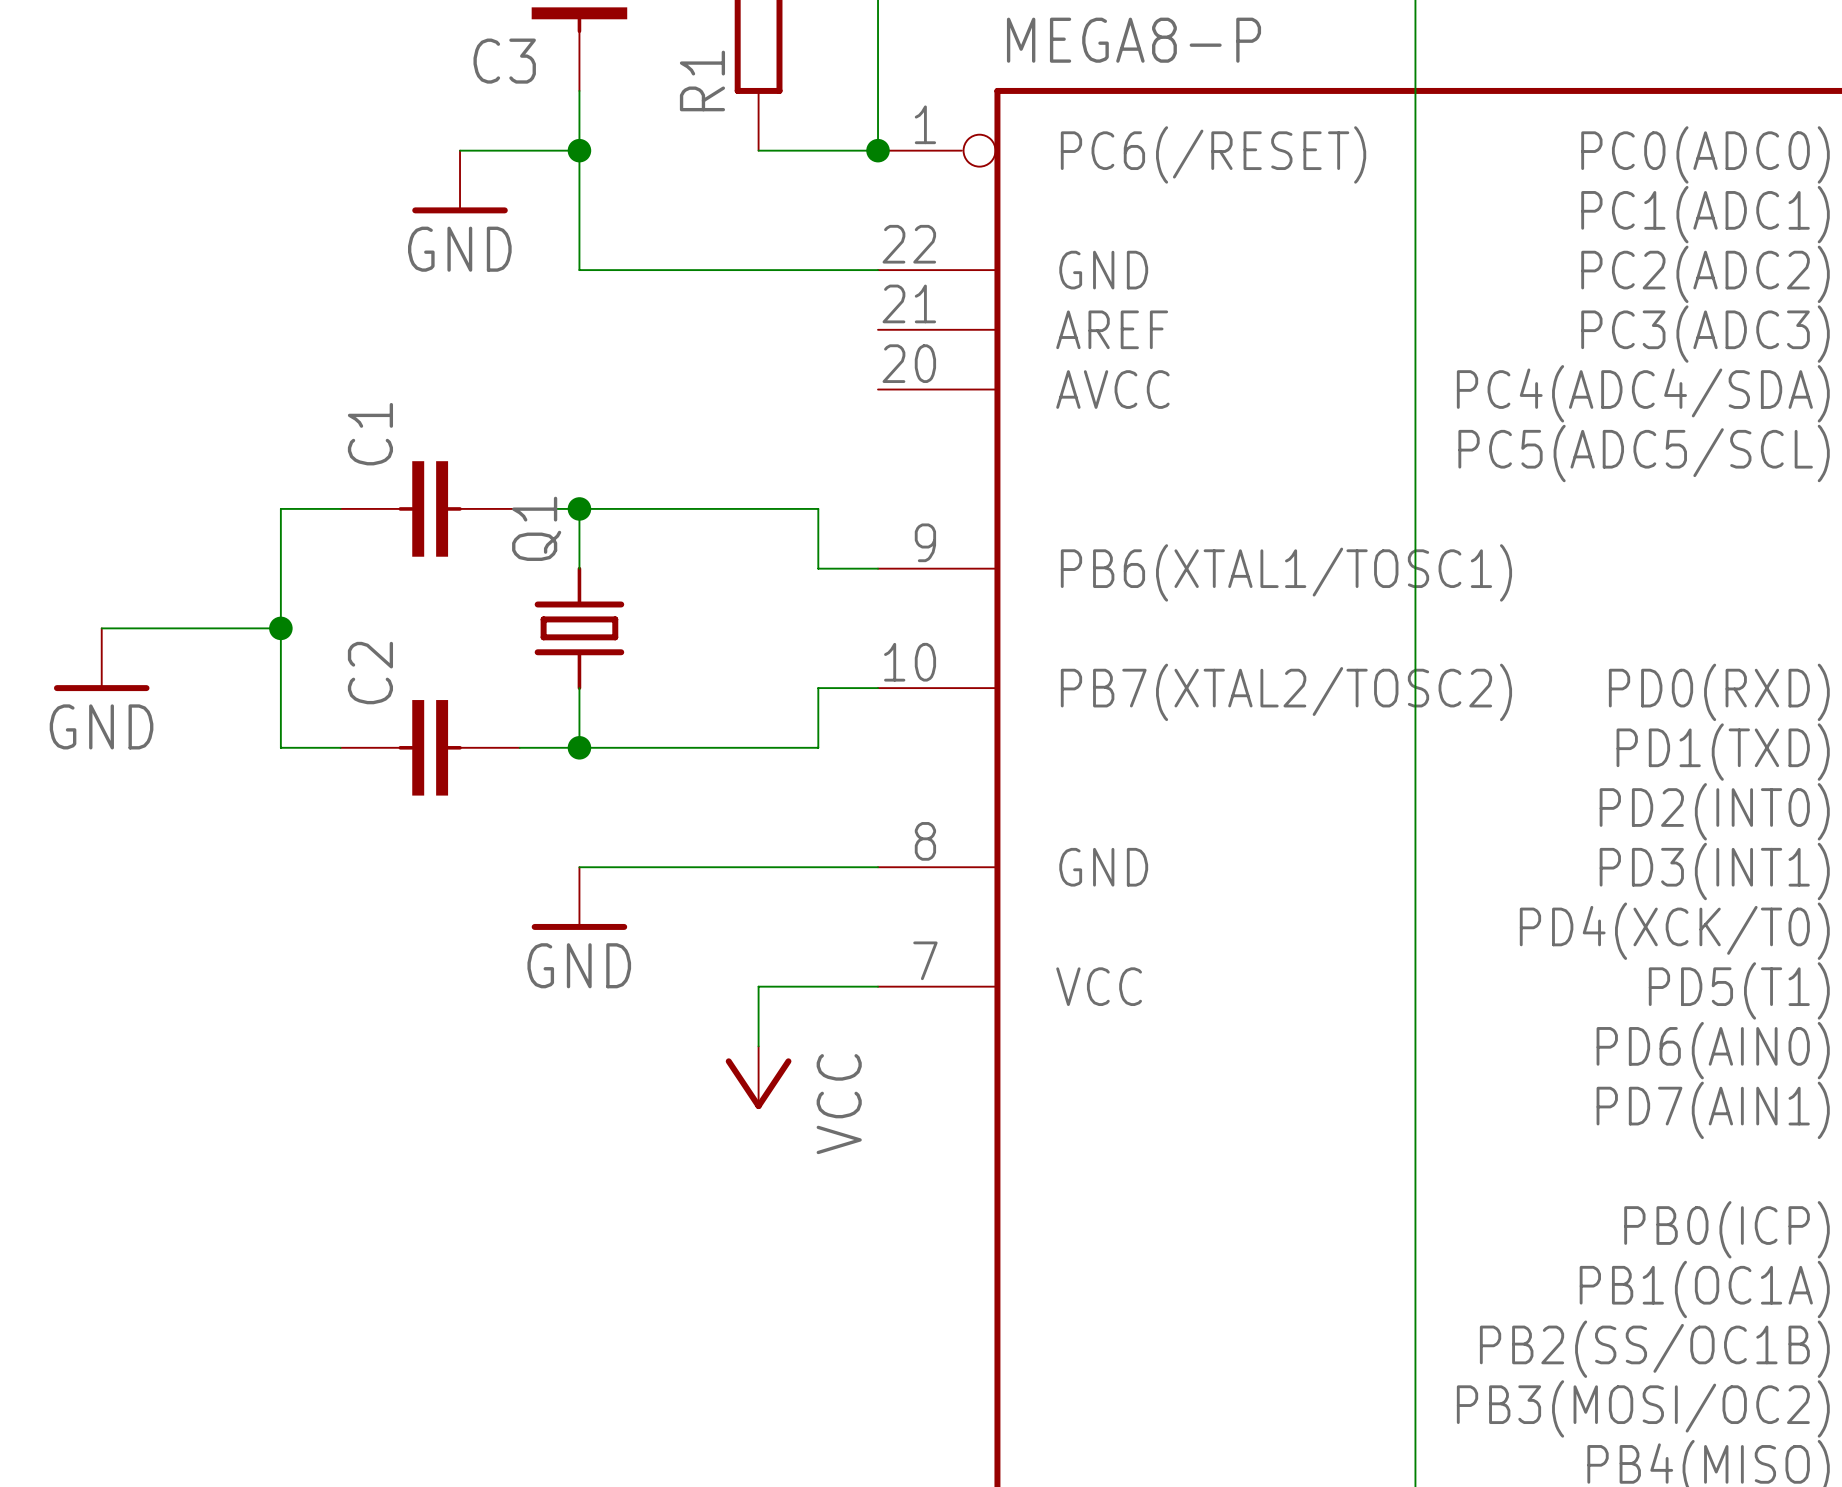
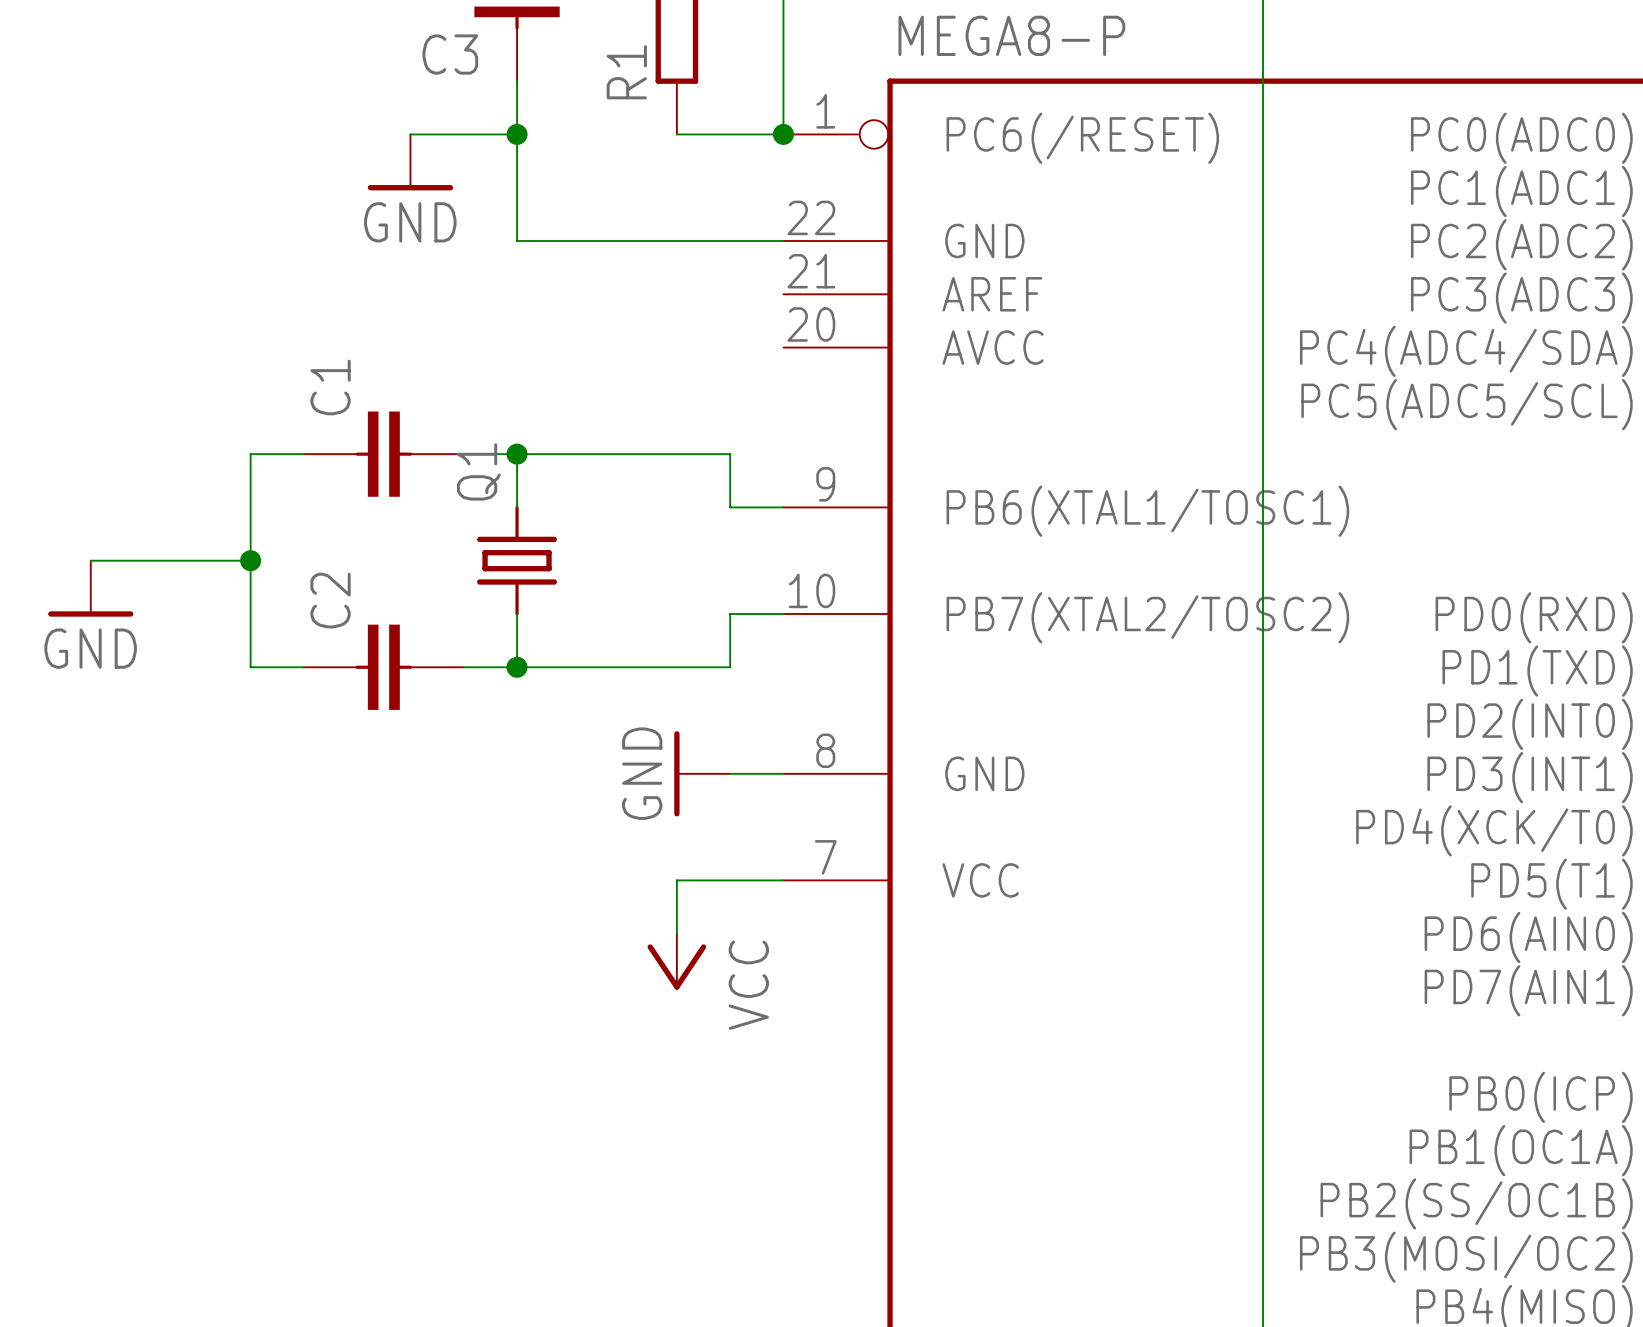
wire: (579, 867) (818, 867) -> none
power symbol position: GND (579, 898) -> GND (702, 773)
power symbol rotation: 0° (579, 926) -> 90° clockwise (676, 773)

